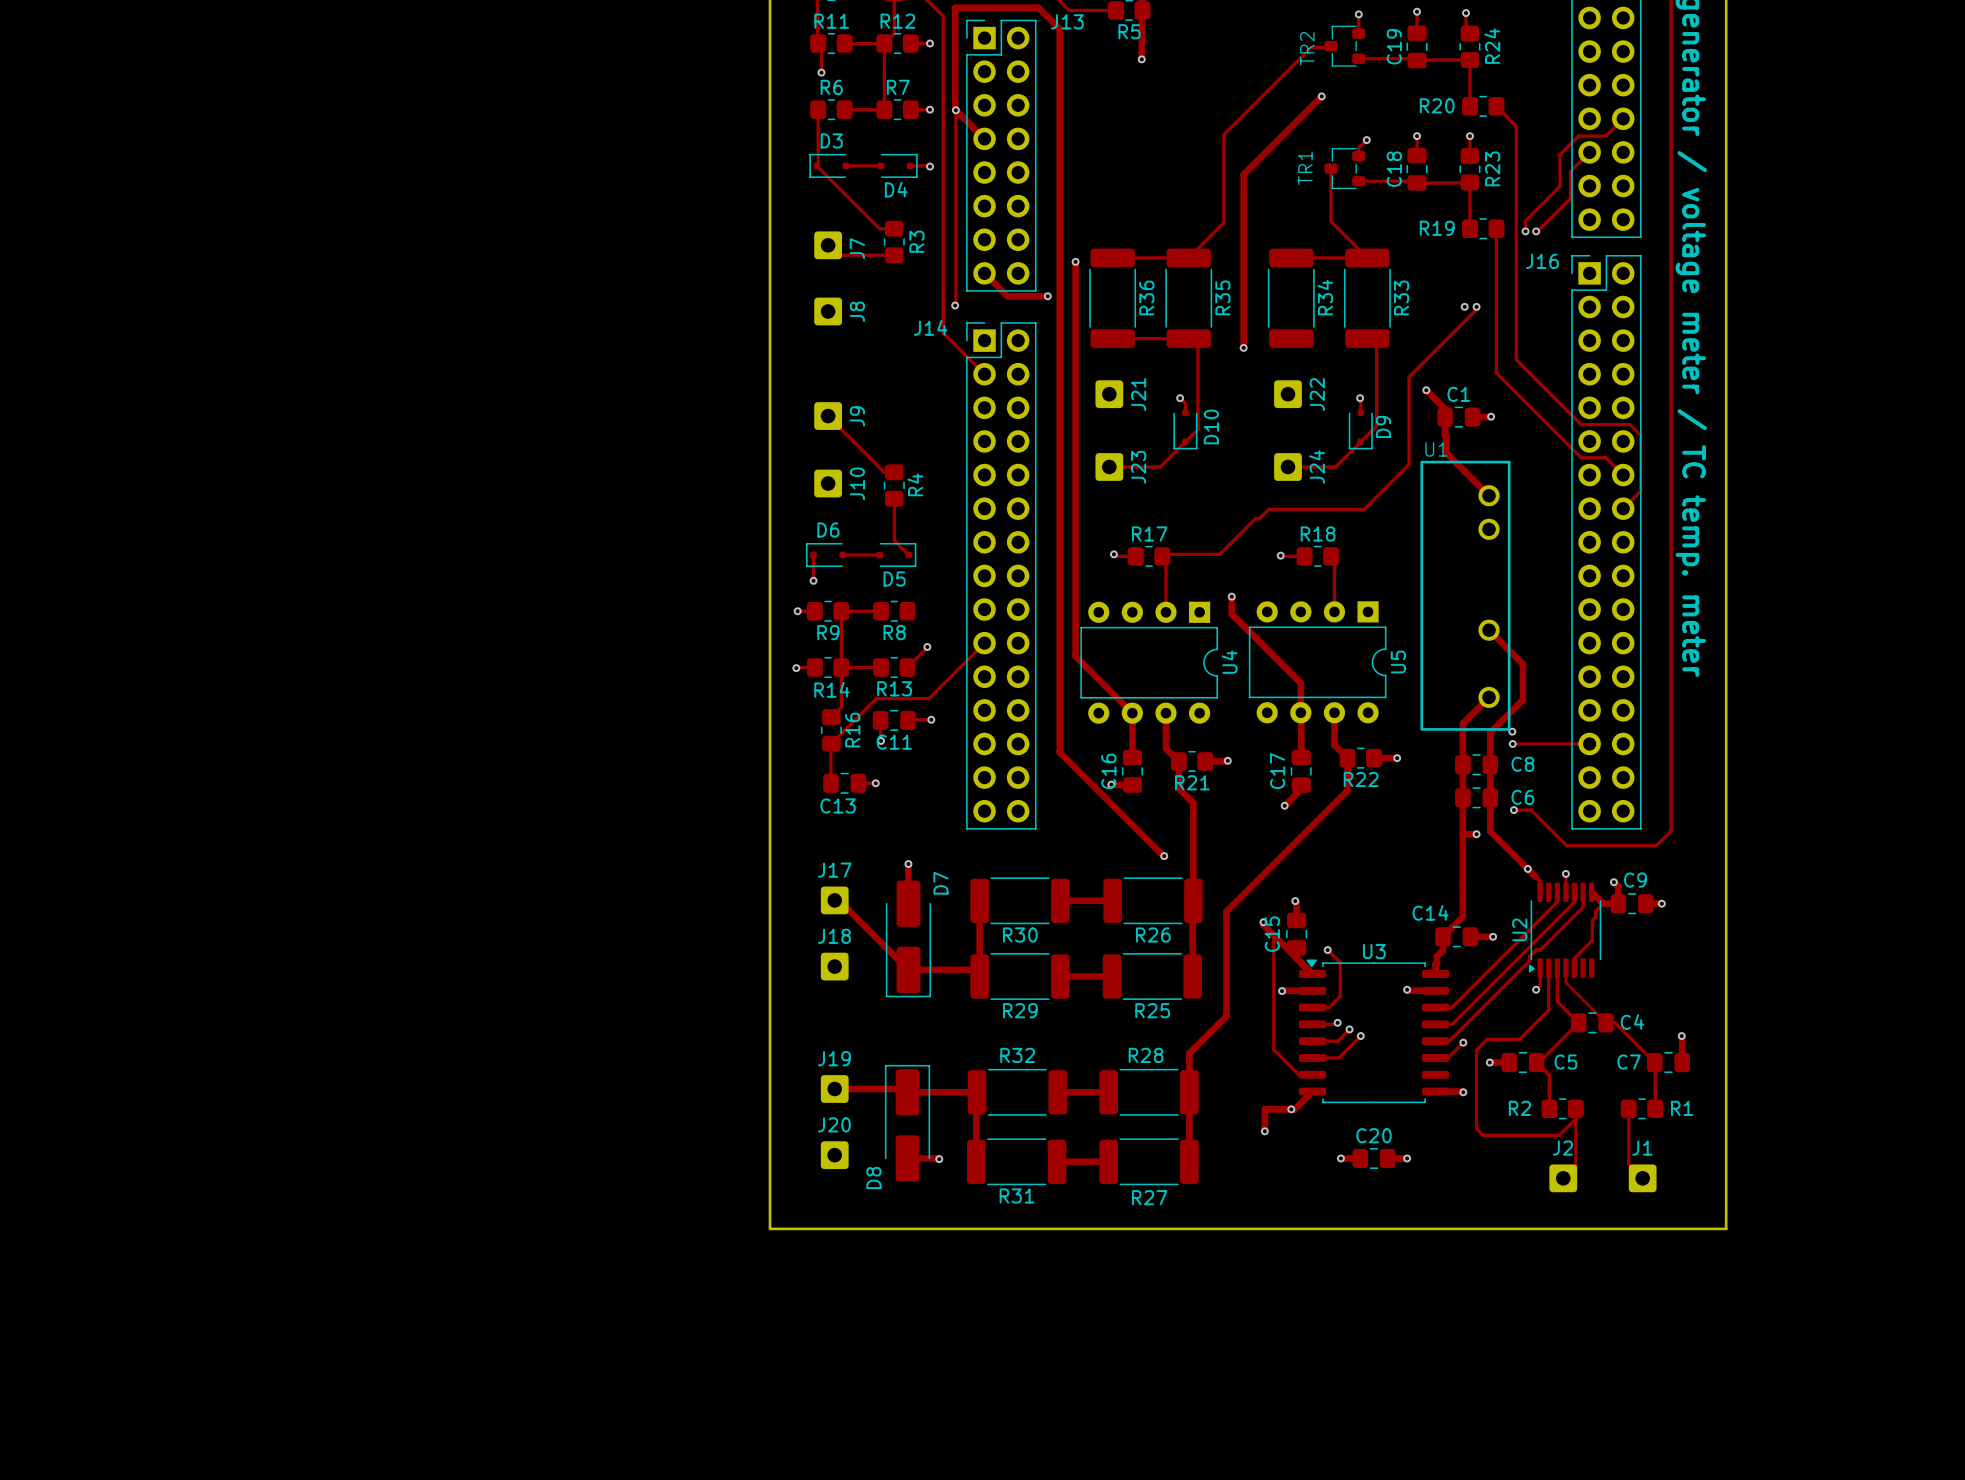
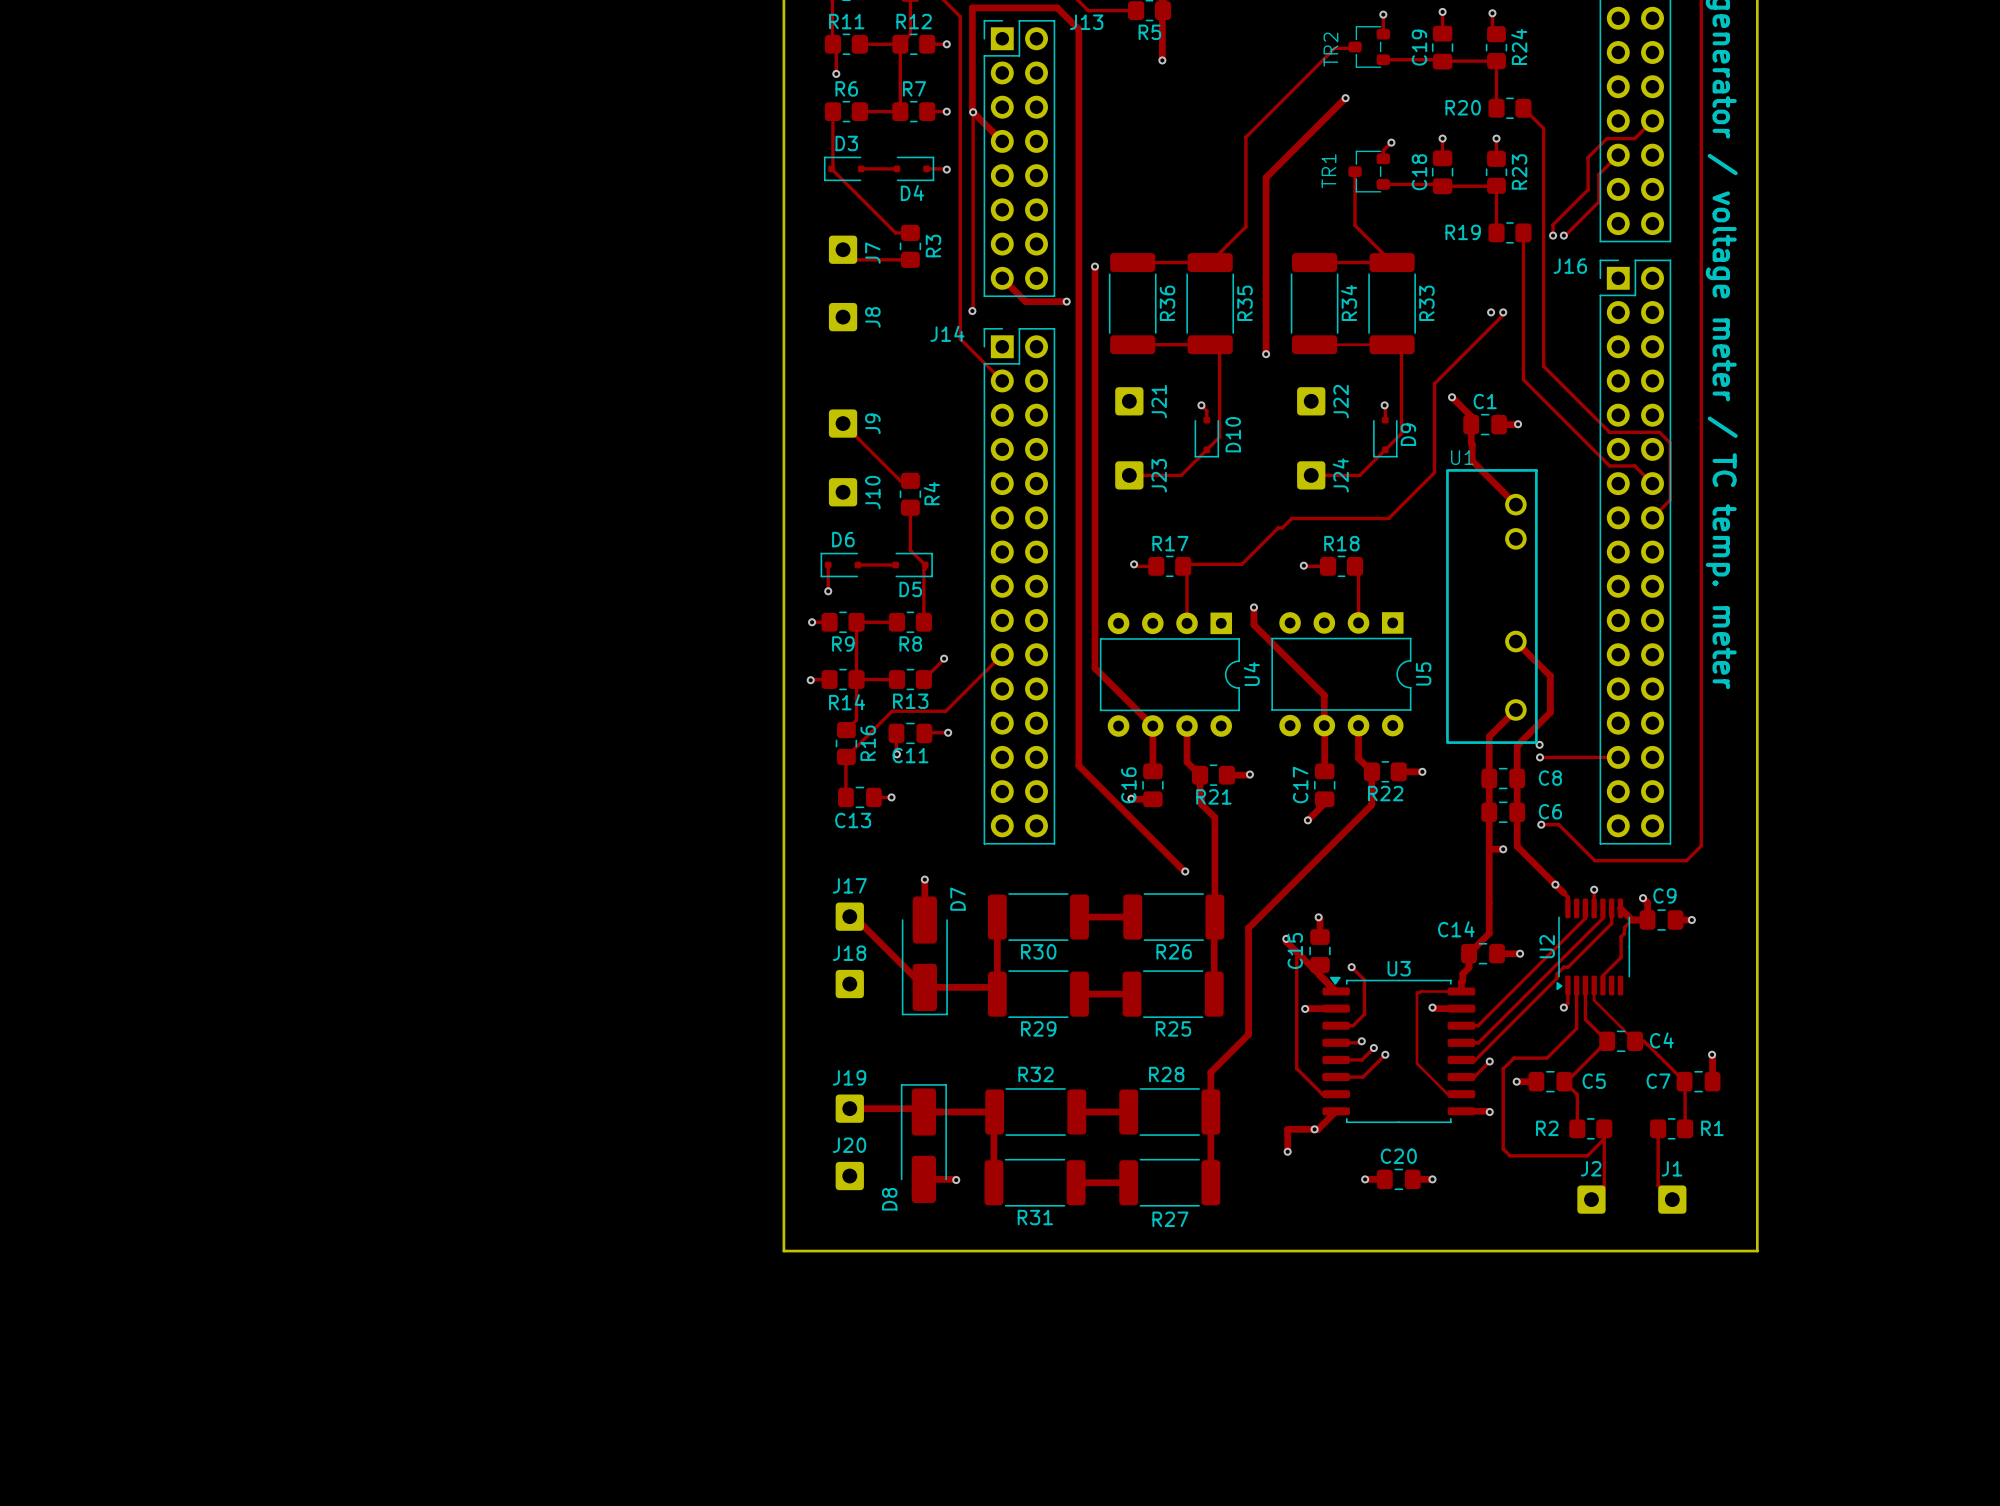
track: none -> (1314, 344) (1392, 344)
track: none -> (925, 565) (923, 622)
track: none -> (1461, 991) (1417, 992) (1417, 1063) (1447, 1094) (1461, 1094)

